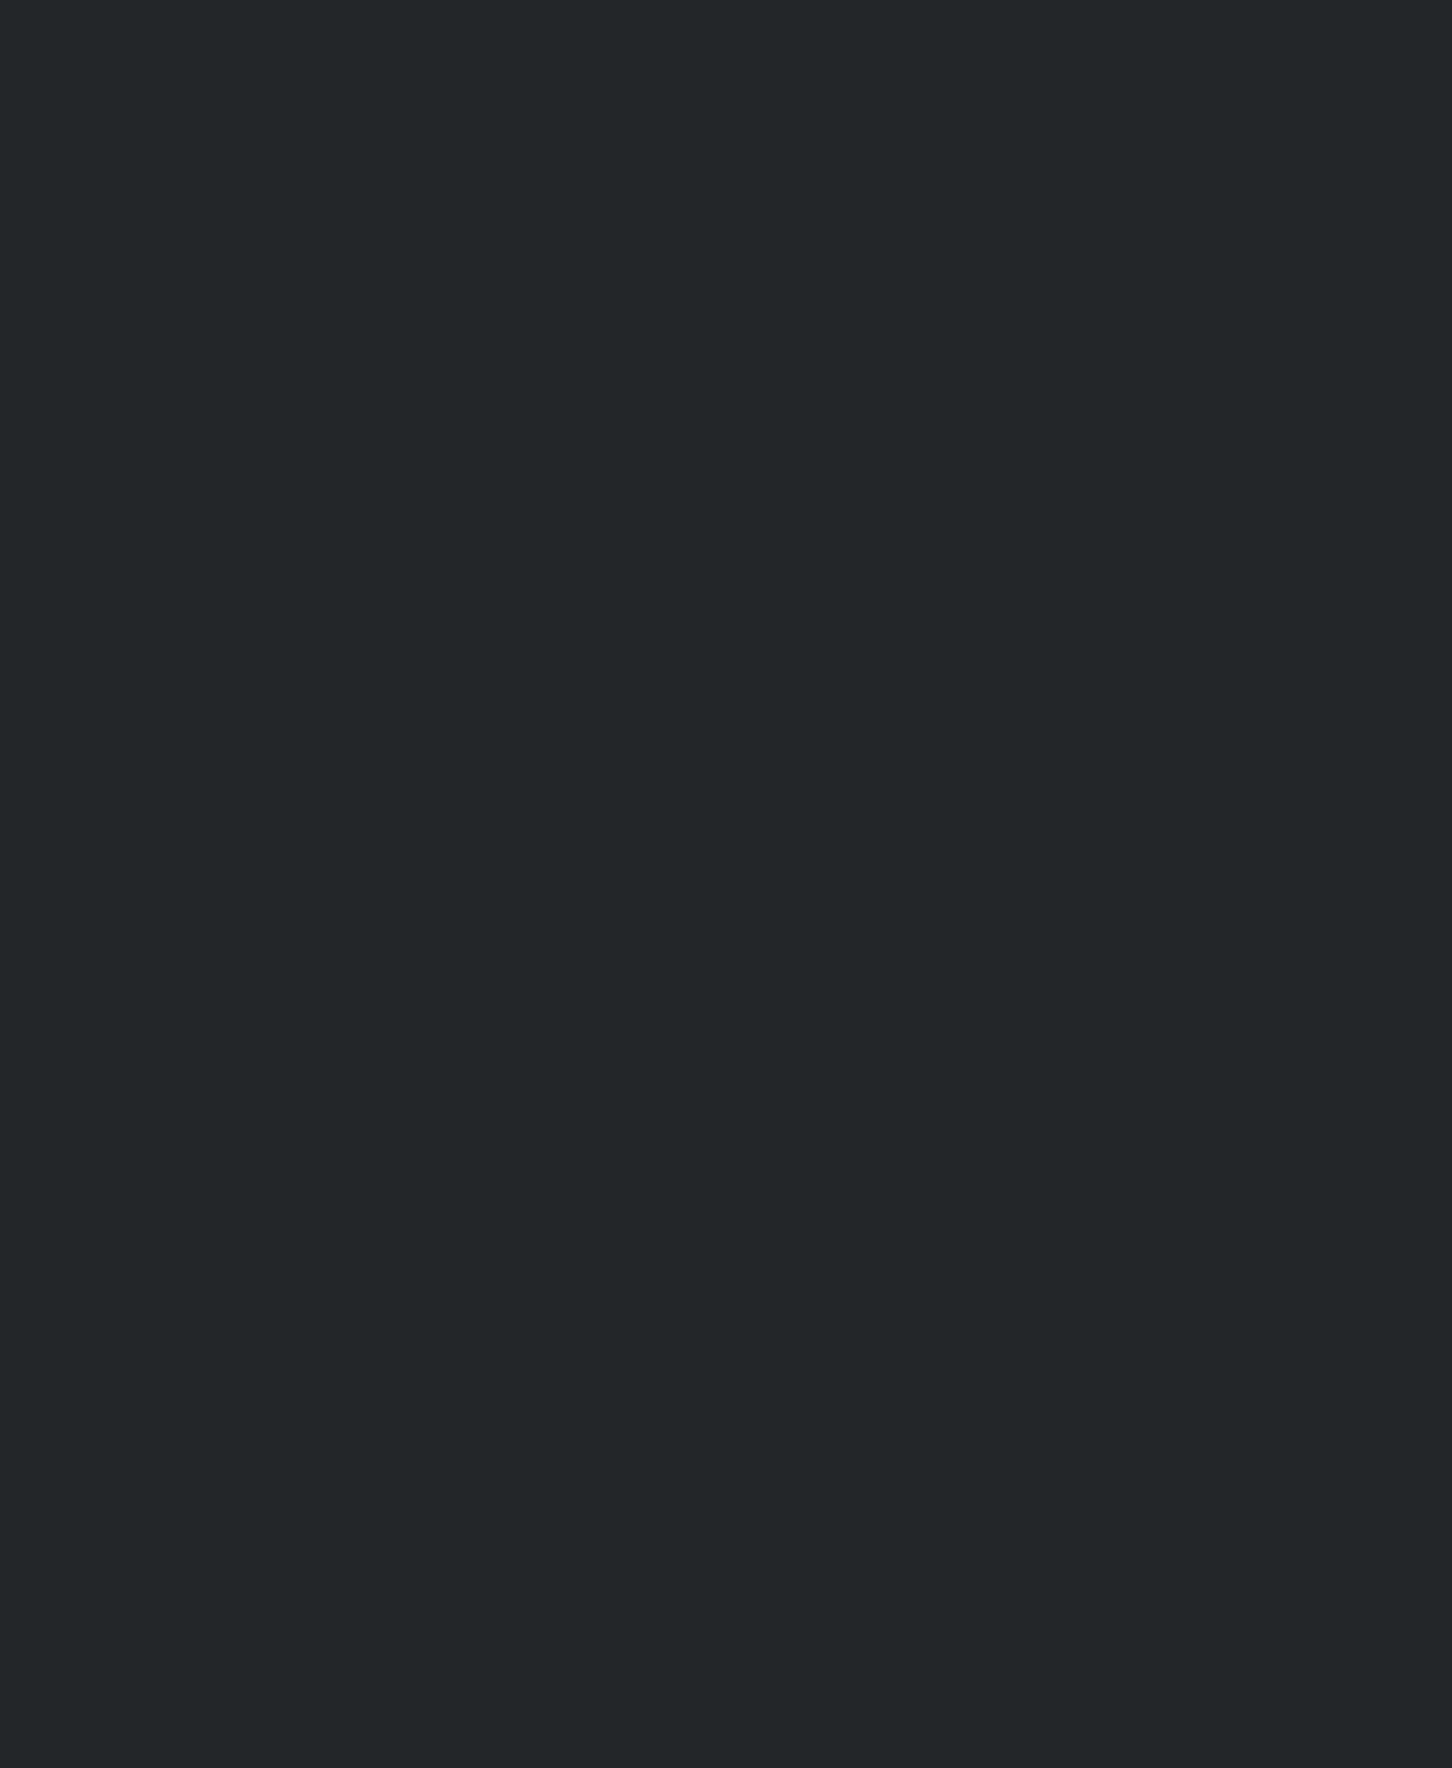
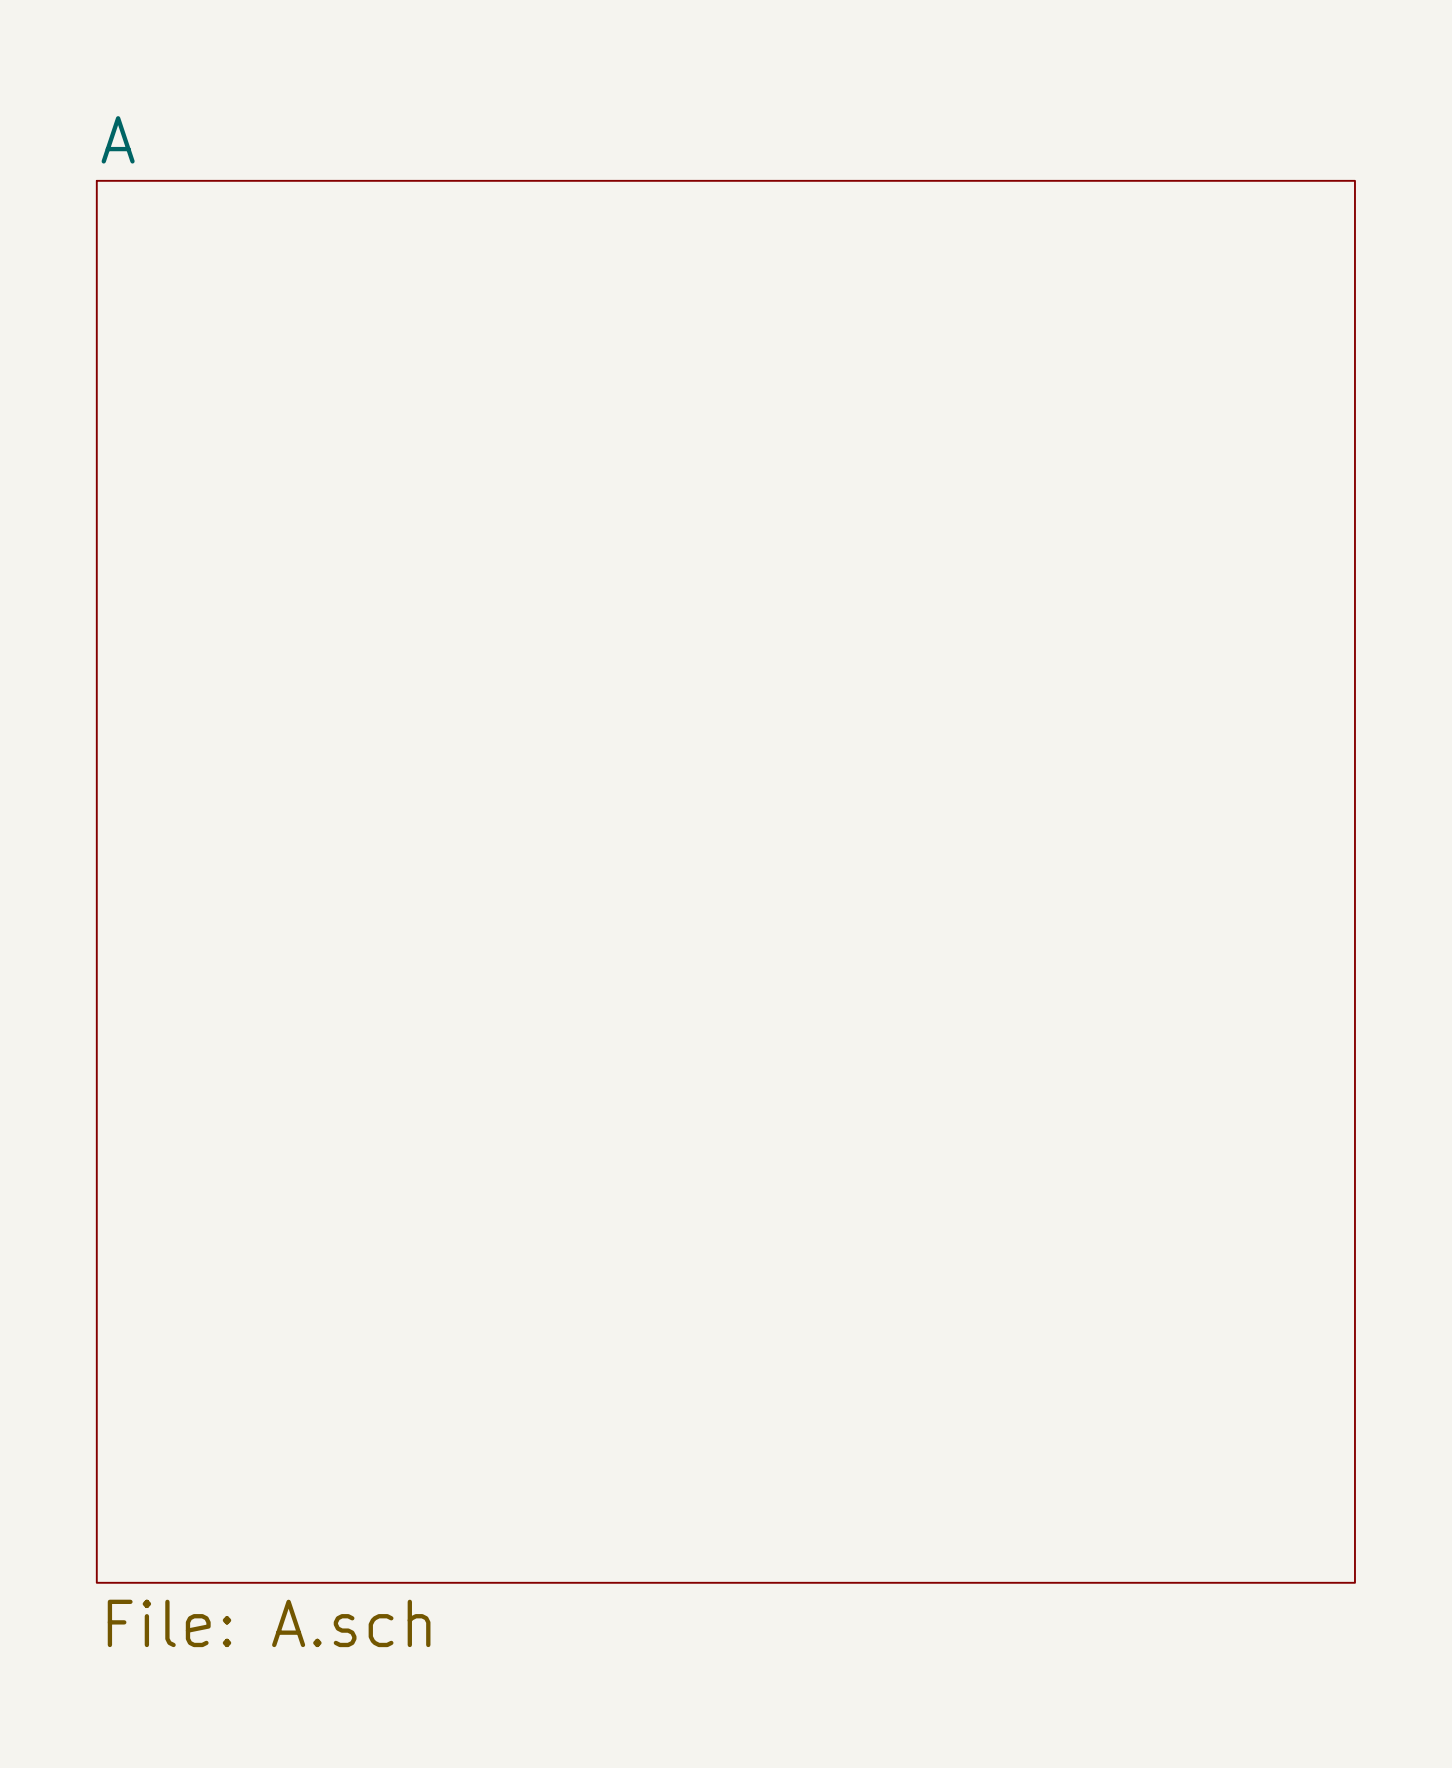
sheet A: none -> File: A.sch (725, 881)

